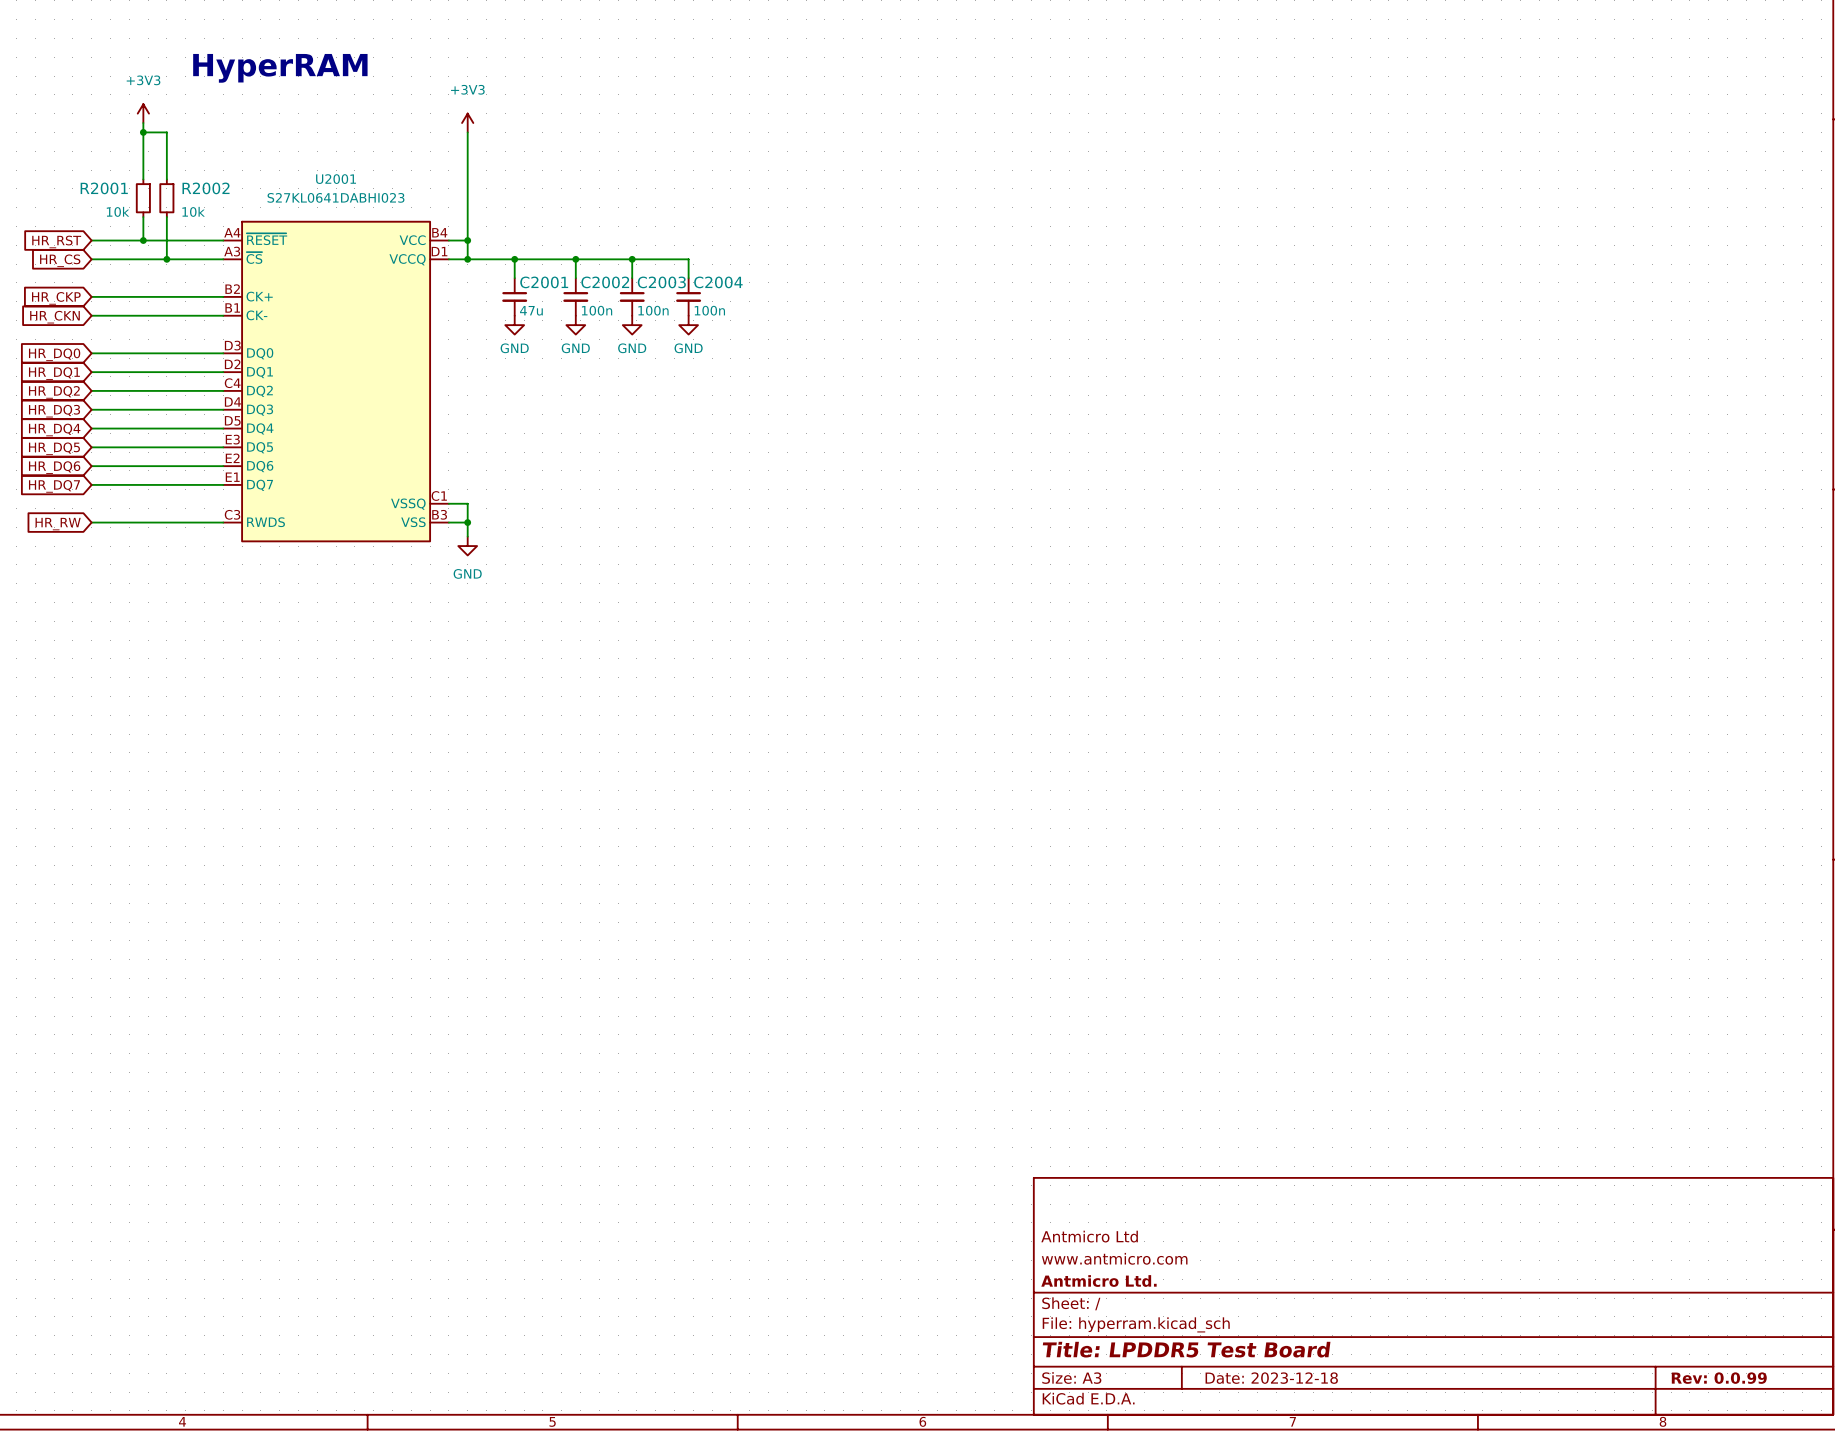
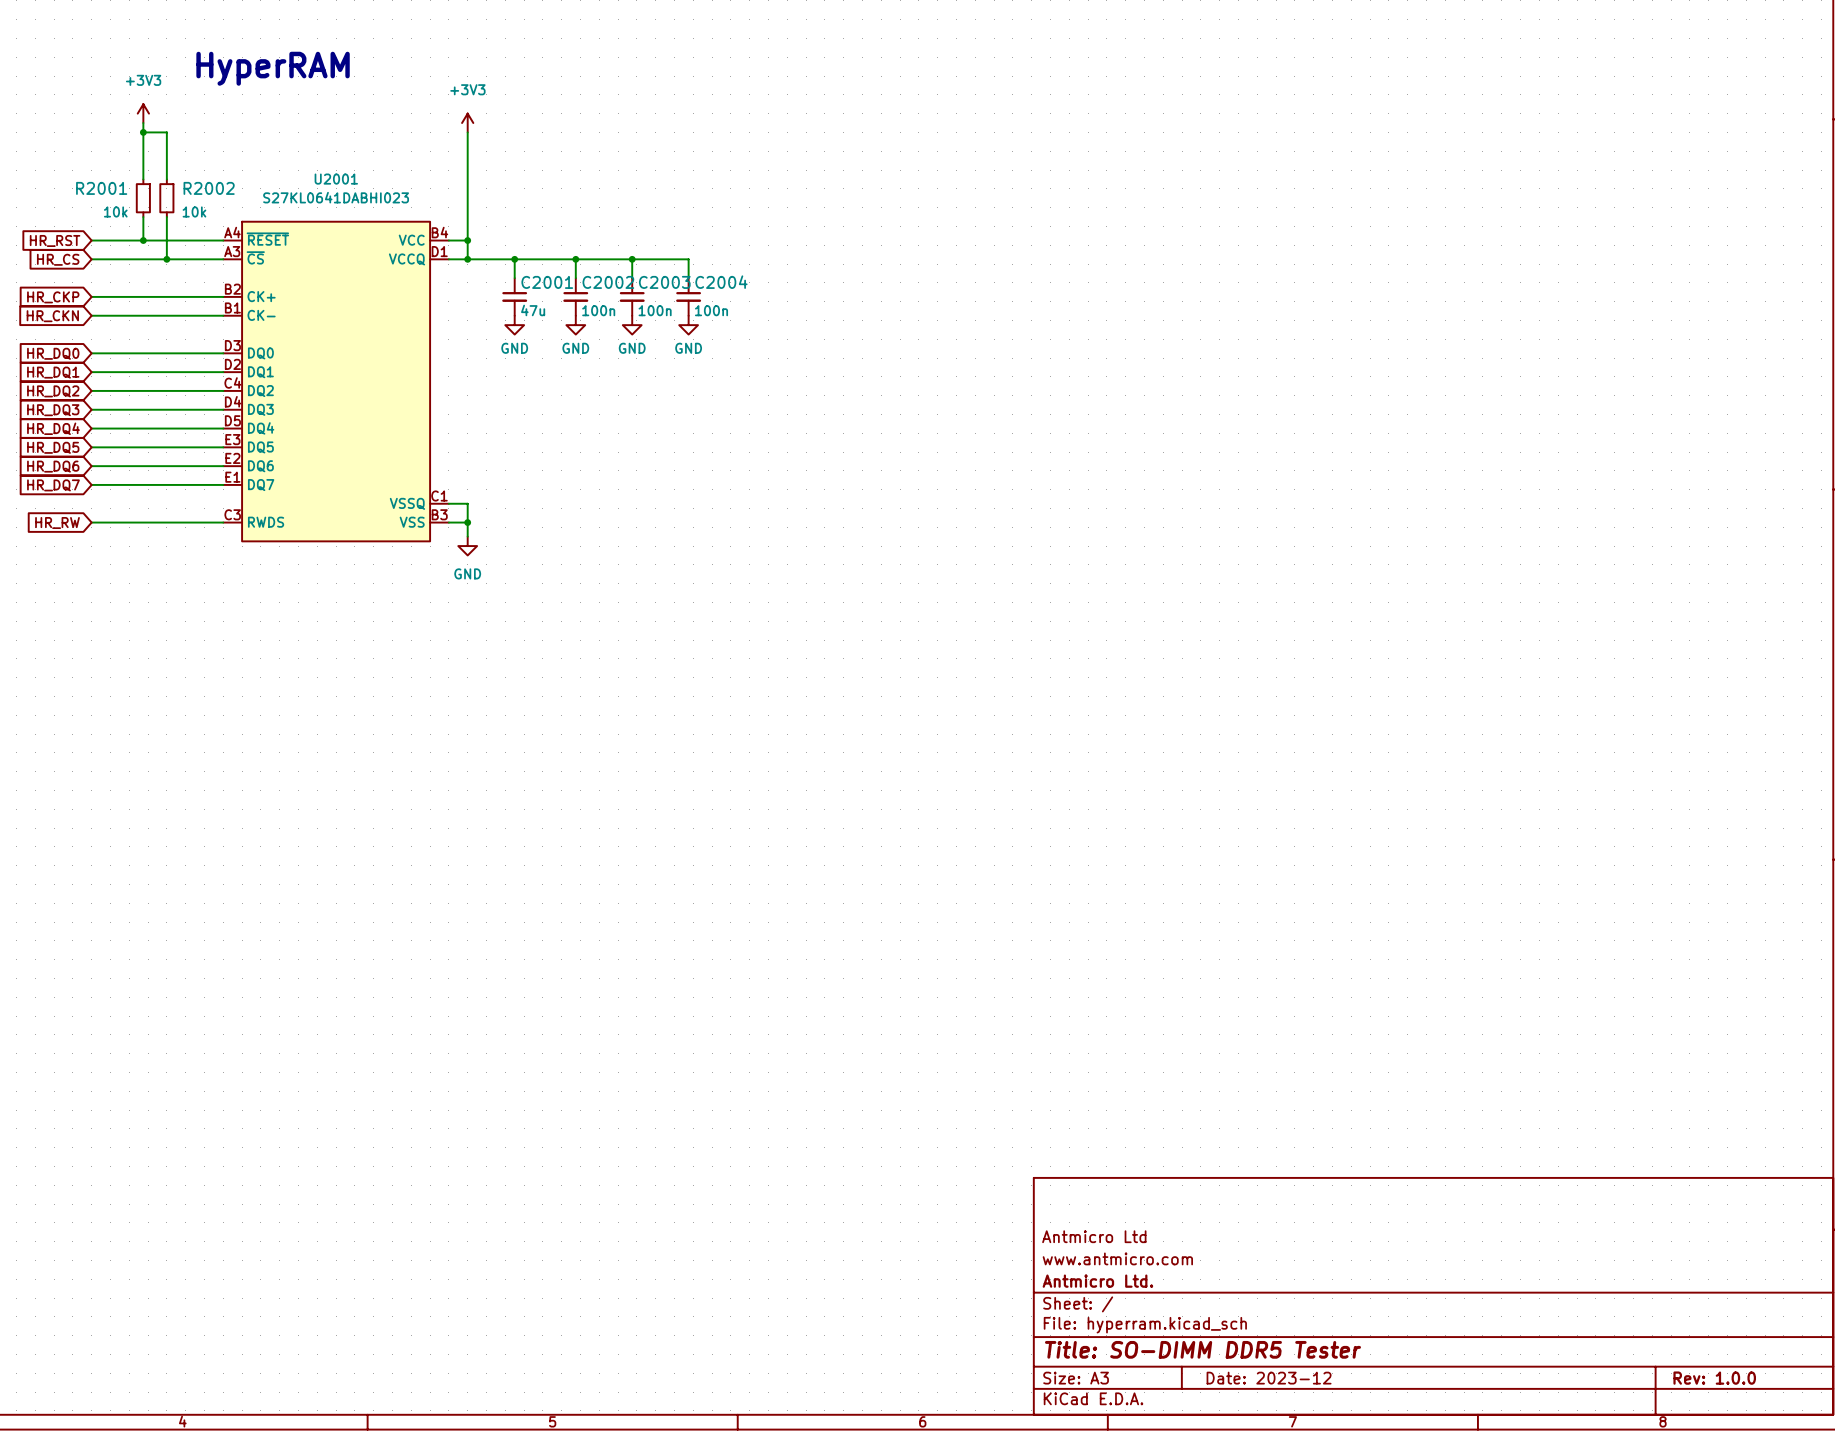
title block: Title: LPDDR5 Test Board (1186, 1349) -> Title: SO-DIMM DDR5 Tester (1202, 1349)
title block: Date: 2023-12-18 (1271, 1378) -> Date: 2023-12 (1269, 1378)
title block: Rev: 0.0.99 (1719, 1378) -> Rev: 1.0.0 (1714, 1378)

